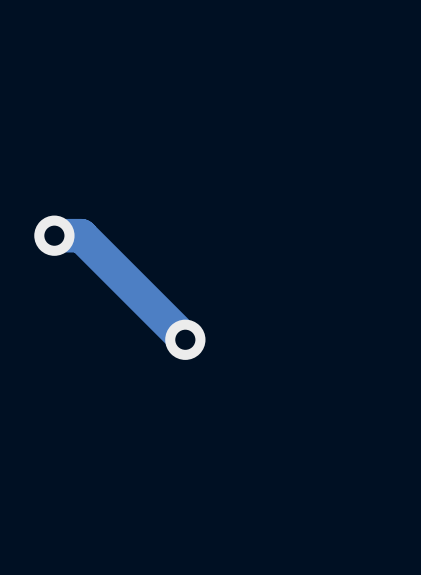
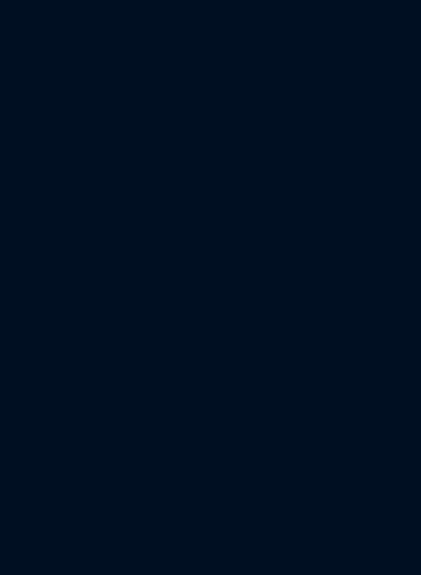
track: (54, 235) (81, 235) (185, 339) -> none
via: (54, 235) -> none
via: (185, 339) -> none

